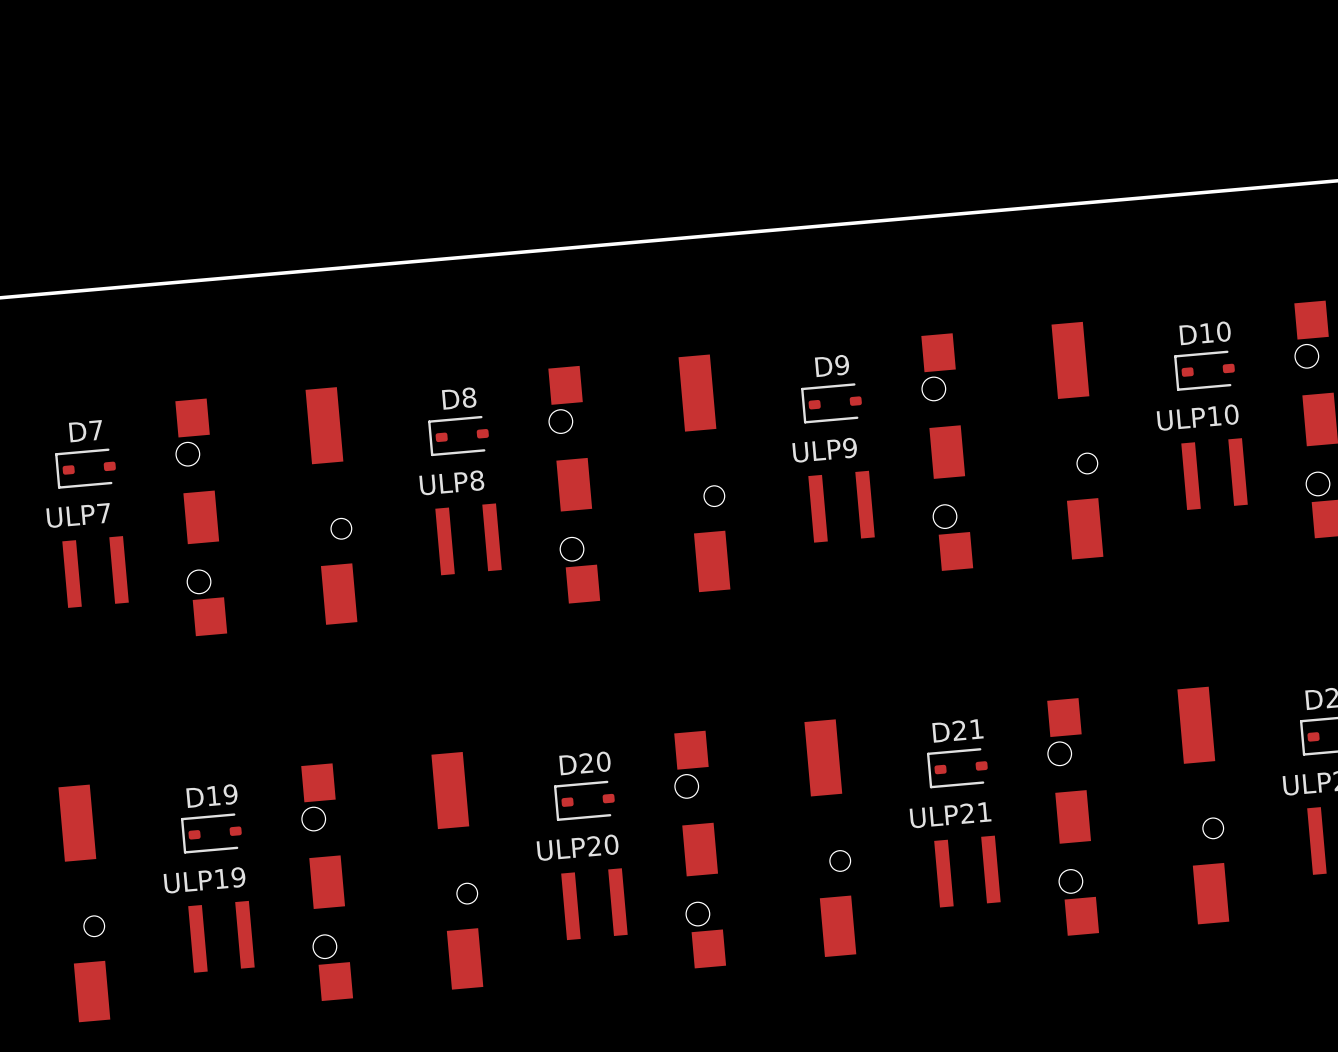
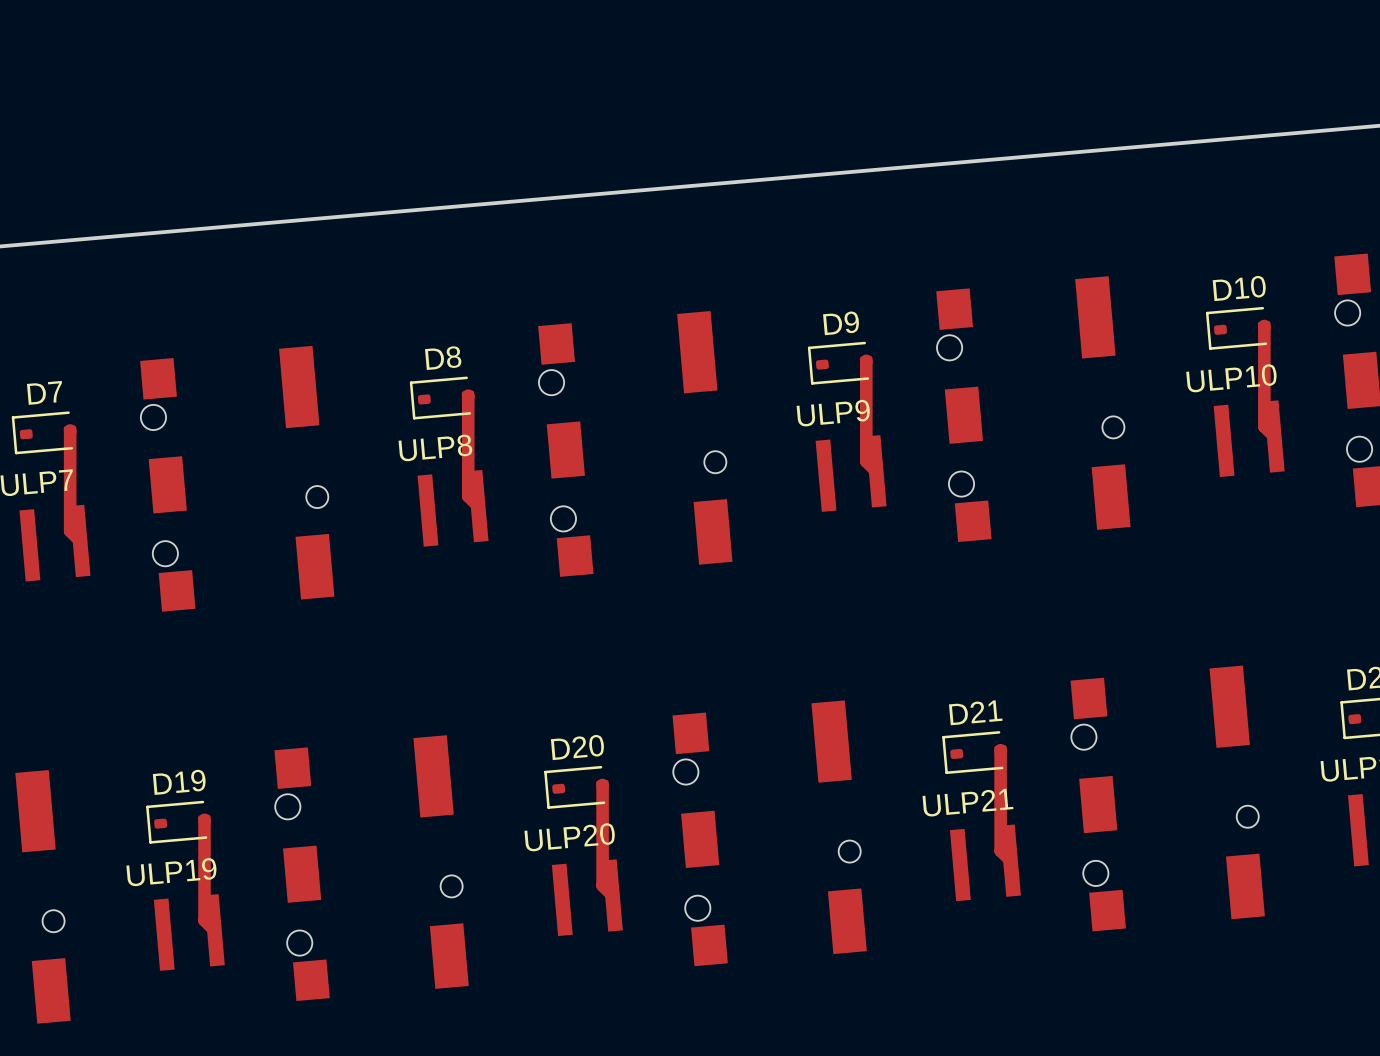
top track: none -> (1264, 325) (1264, 426) (1274, 436)
top track: none -> (866, 360) (866, 461) (876, 471)
top track: none -> (468, 395) (468, 496) (478, 506)
top track: none -> (70, 430) (70, 531) (80, 540)
top track: none -> (1000, 750) (1000, 850) (1010, 860)
top track: none -> (602, 784) (602, 885) (612, 895)
top track: none -> (204, 819) (204, 920) (214, 930)

